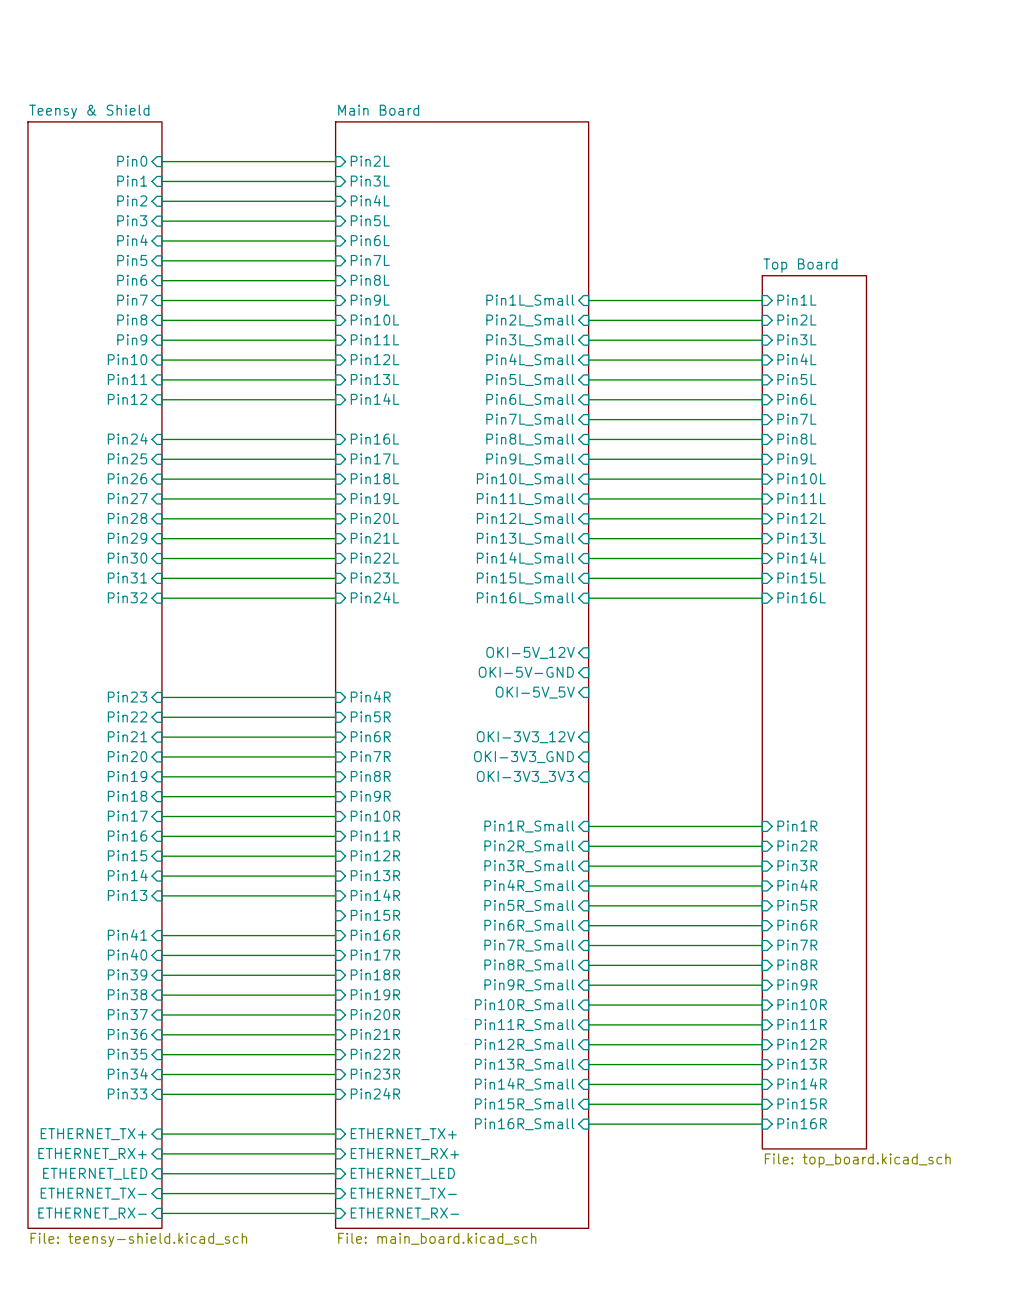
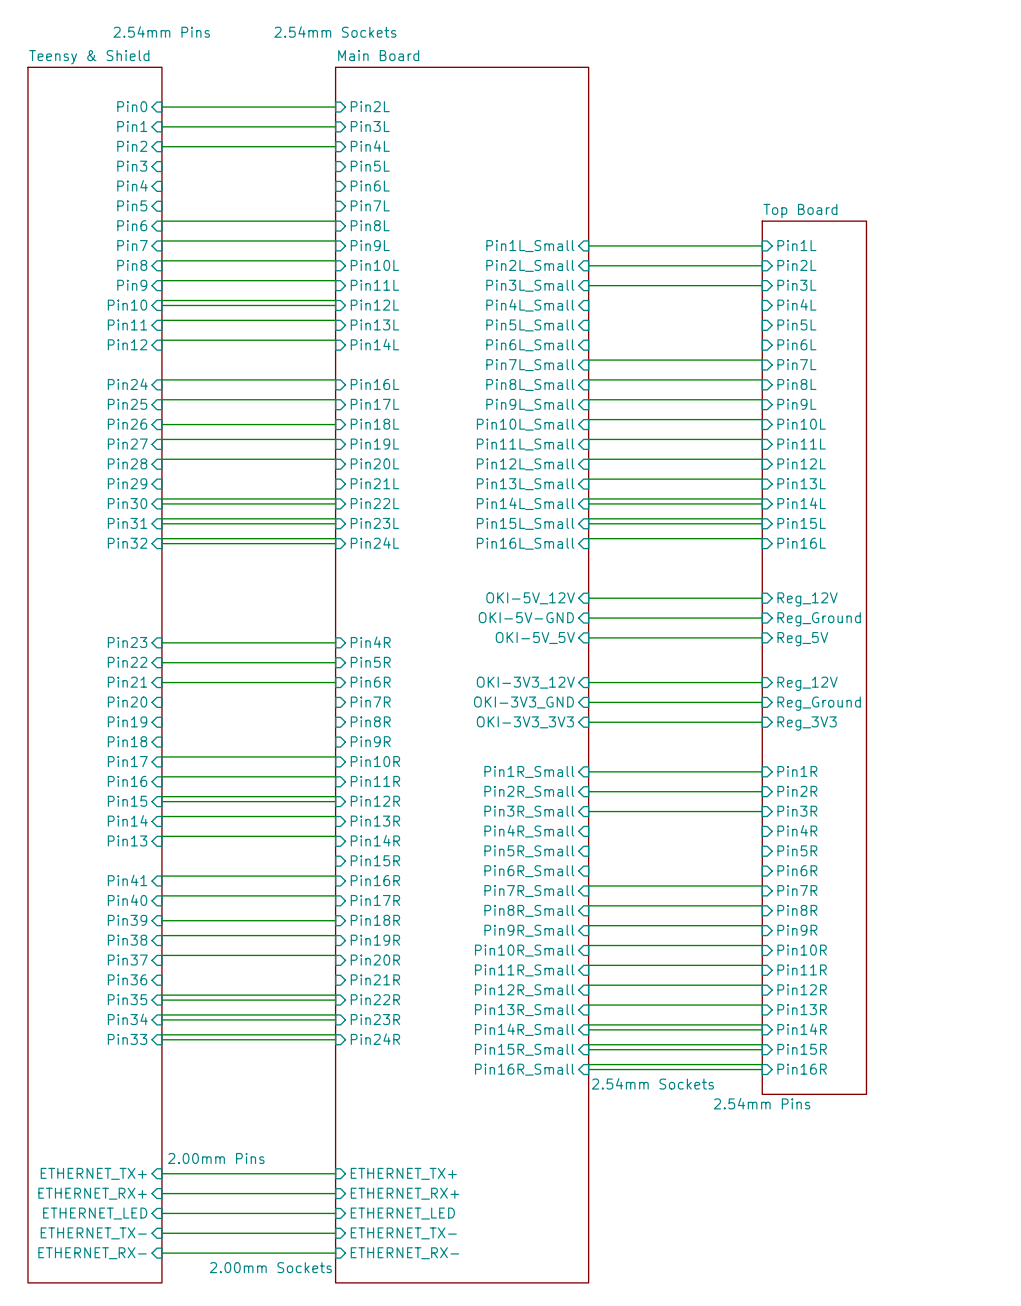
sheet Teensy & Shield text: none -> 2.54mm Pins (161, 31)
sheet Main Board text: none -> 2.54mm Sockets (335, 31)
sheet Main Board name position: Main Board (378, 110) -> Main Board (378, 55)
sheet Teensy & Shield name position: Teensy & Shield (89, 111) -> Teensy & Shield (89, 57)
sheet Teensy & Shield shape: [27, 121, 163, 1229] -> [27, 66, 163, 1284]
sheet Main Board shape: [335, 121, 590, 1229] -> [335, 66, 590, 1284]
sheet pin position: Pin0 (132, 161) -> Pin0 (132, 106)
wire: (161, 161) (335, 161) -> (161, 107) (335, 107)
sheet pin position: Pin2L (370, 161) -> Pin2L (370, 106)
sheet pin position: Pin1 (132, 181) -> Pin1 (132, 126)
wire: (161, 181) (335, 181) -> (161, 126) (335, 126)
sheet pin position: Pin3L (370, 181) -> Pin3L (370, 126)
sheet pin position: Pin2 (132, 200) -> Pin2 (132, 146)
sheet pin position: Pin4L (370, 200) -> Pin4L (370, 146)
wire: (161, 201) (335, 201) -> (161, 146) (335, 146)
sheet pin position: Pin3 (132, 220) -> Pin3 (132, 166)
sheet pin position: Pin5L (370, 220) -> Pin5L (370, 166)
sheet pin position: Pin4 (132, 240) -> Pin4 (132, 185)
sheet pin position: Pin6L (370, 240) -> Pin6L (370, 186)
sheet pin position: Pin5 (132, 260) -> Pin5 (132, 205)
sheet pin position: Pin7L (370, 260) -> Pin7L (370, 205)
sheet pin position: Pin6 (132, 280) -> Pin6 (132, 225)
sheet pin position: Pin8L (370, 280) -> Pin8L (370, 225)
sheet pin position: Pin7 (132, 300) -> Pin7 (132, 245)
sheet pin position: Pin9L (370, 300) -> Pin9L (370, 245)
sheet pin position: Pin1L_Small (530, 300) -> Pin1L_Small (530, 246)
wire: (588, 300) (762, 300) -> (588, 245) (762, 245)
sheet pin position: Pin1L (796, 300) -> Pin1L (796, 245)
sheet pin position: Pin8 (132, 319) -> Pin8 (132, 265)
sheet pin position: Pin10L (374, 319) -> Pin10L (374, 265)
sheet pin position: Pin2L (796, 319) -> Pin2L (796, 265)
sheet pin position: Pin2L_Small (530, 320) -> Pin2L_Small (530, 265)
wire: (588, 320) (762, 320) -> (588, 265) (762, 265)
sheet pin position: Pin9 (132, 339) -> Pin9 (132, 285)
sheet pin position: Pin11L (374, 339) -> Pin11L (374, 285)
sheet pin position: Pin3L (796, 339) -> Pin3L (796, 285)
sheet pin position: Pin3L_Small (530, 340) -> Pin3L_Small (530, 285)
wire: (588, 340) (762, 340) -> (588, 285) (762, 285)
sheet pin position: Pin10 (127, 359) -> Pin10 (127, 305)
sheet pin position: Pin12L (374, 359) -> Pin12L (374, 305)
sheet pin position: Pin4L_Small (530, 359) -> Pin4L_Small (530, 305)
sheet pin position: Pin4L (796, 359) -> Pin4L (796, 304)
wire: (161, 360) (335, 360) -> (161, 305) (335, 305)
sheet pin position: Pin11 (127, 379) -> Pin11 (127, 324)
sheet pin position: Pin13L (374, 379) -> Pin13L (374, 324)
sheet pin position: Pin5L (796, 379) -> Pin5L (796, 324)
sheet pin position: Pin5L_Small (530, 380) -> Pin5L_Small (530, 325)
sheet pin position: Pin12 (127, 399) -> Pin12 (127, 344)
sheet pin position: Pin14L (374, 399) -> Pin14L (374, 344)
sheet pin position: Pin6L_Small (530, 399) -> Pin6L_Small (530, 345)
sheet pin position: Pin6L (796, 399) -> Pin6L (796, 344)
sheet pin position: Pin7L_Small (530, 419) -> Pin7L_Small (530, 365)
sheet pin position: Pin7L (796, 419) -> Pin7L (796, 364)
sheet pin position: Pin24 (127, 438) -> Pin24 (127, 384)
sheet pin position: Pin16L (374, 439) -> Pin16L (374, 384)
sheet pin position: Pin8L_Small (530, 439) -> Pin8L_Small (530, 384)
sheet pin position: Pin8L (796, 439) -> Pin8L (796, 384)
sheet pin position: Pin25 (127, 458) -> Pin25 (127, 404)
sheet pin position: Pin17L (374, 458) -> Pin17L (374, 404)
sheet pin position: Pin9L (796, 458) -> Pin9L (796, 404)
sheet pin position: Pin9L_Small (530, 459) -> Pin9L_Small (530, 404)
sheet pin position: Pin26 (127, 478) -> Pin26 (127, 424)
sheet pin position: Pin18L (374, 478) -> Pin18L (374, 424)
sheet pin position: Pin10L (801, 478) -> Pin10L (801, 424)
wire: (161, 479) (335, 479) -> (161, 424) (335, 424)
sheet pin position: Pin10L_Small (525, 479) -> Pin10L_Small (525, 424)
sheet pin position: Pin27 (127, 498) -> Pin27 (127, 444)
sheet pin position: Pin19L (374, 498) -> Pin19L (374, 444)
sheet pin position: Pin11L (801, 498) -> Pin11L (801, 444)
sheet pin position: Pin11L_Small (525, 499) -> Pin11L_Small (525, 444)
sheet pin position: Pin28 (127, 518) -> Pin28 (127, 463)
sheet pin position: Pin20L (374, 518) -> Pin20L (374, 463)
sheet pin position: Pin12L_Small (525, 518) -> Pin12L_Small (525, 464)
sheet pin position: Pin12L (801, 518) -> Pin12L (801, 463)
sheet pin position: Pin29 (127, 538) -> Pin29 (127, 483)
sheet pin position: Pin21L (374, 538) -> Pin21L (374, 483)
sheet pin position: Pin13L_Small (525, 538) -> Pin13L_Small (525, 484)
sheet pin position: Pin13L (801, 538) -> Pin13L (801, 483)
sheet pin: none -> Pin16L_Small (525, 543)
sheet pin: none -> Pin16L (801, 543)
sheet pin position: Pin14L (801, 557) -> Pin14L (801, 503)
sheet pin position: Pin30 (127, 558) -> Pin30 (127, 503)
wire: (161, 558) (335, 558) -> (161, 503) (335, 503)
sheet pin position: Pin22L (374, 558) -> Pin22L (374, 503)
sheet pin position: Pin14L_Small (525, 558) -> Pin14L_Small (525, 503)
wire: (588, 558) (762, 558) -> (588, 503) (762, 503)
sheet pin position: Pin31 (127, 577) -> Pin31 (127, 523)
sheet pin position: Pin23L (374, 577) -> Pin23L (374, 523)
sheet pin position: Pin15L (801, 577) -> Pin15L (801, 523)
wire: (161, 578) (335, 578) -> (161, 523) (335, 523)
sheet pin position: Pin15L_Small (525, 578) -> Pin15L_Small (525, 523)
wire: (588, 578) (762, 578) -> (588, 523) (762, 523)
sheet pin position: Pin32 (127, 597) -> Pin32 (127, 543)
sheet pin position: Pin24L (374, 597) -> Pin24L (374, 543)
sheet pin: Pin16L (801, 597) -> Reg_12V (807, 599)
wire: (161, 598) (335, 598) -> (161, 543) (335, 543)
sheet pin: Pin16L_Small (525, 598) -> OKI-5V_12V (530, 598)
wire: none -> (588, 618) (762, 618)
sheet pin: none -> Reg_Ground (819, 619)
wire: none -> (588, 637) (762, 637)
sheet pin: none -> Reg_5V (802, 639)
sheet pin: OKI-5V_12V (530, 652) -> none
sheet Top Board: none -> (814, 657)
sheet pin position: OKI-5V-GND (526, 672) -> OKI-5V-GND (526, 617)
wire: none -> (588, 682) (762, 682)
sheet pin: none -> Reg_12V (807, 683)
sheet pin position: OKI-5V_5V (535, 692) -> OKI-5V_5V (535, 638)
sheet pin position: Pin4R (370, 696) -> Pin4R (370, 642)
sheet pin position: Pin23 (127, 697) -> Pin23 (127, 642)
wire: (161, 697) (335, 697) -> (161, 642) (335, 642)
wire: none -> (588, 702) (762, 702)
sheet pin: none -> Reg_Ground (819, 703)
sheet Top Board: File: top_board.kicad_sch (814, 712) -> none
sheet pin position: Pin22 (127, 716) -> Pin22 (127, 662)
sheet pin position: Pin5R (370, 716) -> Pin5R (370, 662)
wire: (161, 717) (335, 717) -> (161, 662) (335, 662)
wire: none -> (588, 722) (762, 722)
sheet pin: none -> Reg_3V3 (807, 723)
sheet pin position: Pin21 (127, 736) -> Pin21 (127, 682)
sheet pin position: Pin6R (370, 736) -> Pin6R (370, 682)
wire: (161, 737) (335, 737) -> (161, 682) (335, 682)
sheet pin position: OKI-3V3_12V (525, 737) -> OKI-3V3_12V (525, 682)
sheet pin position: Pin20 (127, 756) -> Pin20 (127, 702)
sheet pin position: Pin7R (370, 756) -> Pin7R (370, 702)
sheet pin position: OKI-3V3_GND (523, 757) -> OKI-3V3_GND (523, 702)
sheet pin position: Pin19 (127, 776) -> Pin19 (127, 721)
sheet pin position: Pin8R (370, 776) -> Pin8R (370, 721)
sheet pin position: OKI-3V3_3V3 (525, 776) -> OKI-3V3_3V3 (525, 722)
sheet pin position: Pin18 (127, 796) -> Pin18 (127, 741)
sheet pin position: Pin9R (370, 796) -> Pin9R (370, 741)
sheet pin position: Pin17 (127, 816) -> Pin17 (127, 761)
sheet pin position: Pin10R (375, 816) -> Pin10R (375, 761)
sheet pin position: Pin1R_Small (529, 826) -> Pin1R_Small (529, 771)
wire: (588, 826) (762, 826) -> (588, 771) (762, 771)
sheet pin position: Pin1R (797, 826) -> Pin1R (797, 771)
sheet pin position: Pin16 (127, 835) -> Pin16 (127, 781)
sheet pin position: Pin11R (375, 835) -> Pin11R (375, 781)
sheet pin position: Pin2R (797, 845) -> Pin2R (797, 791)
sheet pin position: Pin2R_Small (529, 846) -> Pin2R_Small (529, 791)
wire: (588, 846) (762, 846) -> (588, 791) (762, 791)
sheet pin position: Pin15 (127, 855) -> Pin15 (127, 801)
sheet pin position: Pin12R (375, 855) -> Pin12R (375, 801)
wire: (161, 856) (335, 856) -> (161, 801) (335, 801)
sheet pin position: Pin3R (797, 865) -> Pin3R (797, 811)
sheet pin position: Pin3R_Small (529, 866) -> Pin3R_Small (529, 811)
wire: (588, 866) (762, 866) -> (588, 811) (762, 811)
sheet pin position: Pin14 (127, 875) -> Pin14 (127, 820)
sheet pin position: Pin13R (375, 875) -> Pin13R (375, 821)
sheet pin position: Pin4R_Small (529, 885) -> Pin4R_Small (529, 831)
sheet pin position: Pin4R (797, 885) -> Pin4R (797, 830)
sheet pin position: Pin13 (127, 895) -> Pin13 (127, 840)
sheet pin position: Pin14R (375, 895) -> Pin14R (375, 840)
sheet pin position: Pin5R_Small (529, 905) -> Pin5R_Small (529, 851)
sheet pin position: Pin5R (797, 905) -> Pin5R (797, 850)
sheet pin position: Pin15R (375, 915) -> Pin15R (375, 860)
sheet pin position: Pin6R_Small (529, 925) -> Pin6R_Small (529, 871)
sheet pin position: Pin6R (797, 925) -> Pin6R (797, 870)
sheet pin position: Pin41 (127, 934) -> Pin41 (127, 880)
sheet pin position: Pin16R (375, 935) -> Pin16R (375, 880)
sheet pin position: Pin7R_Small (529, 945) -> Pin7R_Small (529, 891)
sheet pin position: Pin7R (797, 945) -> Pin7R (797, 890)
sheet pin position: Pin40 (127, 954) -> Pin40 (127, 900)
sheet pin position: Pin17R (375, 955) -> Pin17R (375, 900)
sheet pin position: Pin8R (797, 964) -> Pin8R (797, 910)
sheet pin position: Pin8R_Small (529, 965) -> Pin8R_Small (529, 910)
sheet pin position: Pin39 (127, 974) -> Pin39 (127, 920)
sheet pin position: Pin18R (375, 974) -> Pin18R (375, 920)
wire: (161, 975) (335, 975) -> (161, 920) (335, 920)
sheet pin position: Pin9R (797, 984) -> Pin9R (797, 930)
sheet pin position: Pin9R_Small (529, 985) -> Pin9R_Small (529, 930)
sheet pin position: Pin38 (127, 994) -> Pin38 (127, 940)
sheet pin position: Pin19R (375, 994) -> Pin19R (375, 940)
sheet pin position: Pin10R (802, 1004) -> Pin10R (802, 950)
sheet pin position: Pin10R_Small (524, 1005) -> Pin10R_Small (524, 950)
sheet pin position: Pin37 (127, 1014) -> Pin37 (127, 960)
sheet pin position: Pin20R (375, 1014) -> Pin20R (375, 960)
sheet pin position: Pin11R_Small (524, 1024) -> Pin11R_Small (524, 970)
sheet pin position: Pin11R (802, 1024) -> Pin11R (802, 969)
sheet pin position: Pin36 (127, 1034) -> Pin36 (127, 979)
sheet pin position: Pin21R (375, 1034) -> Pin21R (375, 979)
sheet pin position: Pin12R_Small (524, 1044) -> Pin12R_Small (524, 990)
sheet pin position: Pin12R (802, 1044) -> Pin12R (802, 989)
sheet pin position: Pin35 (127, 1054) -> Pin35 (127, 999)
wire: (161, 1054) (335, 1054) -> (161, 1000) (335, 1000)
sheet pin position: Pin22R (375, 1054) -> Pin22R (375, 999)
sheet pin position: Pin13R_Small (524, 1064) -> Pin13R_Small (524, 1010)
sheet pin position: Pin13R (802, 1064) -> Pin13R (802, 1009)
sheet pin position: Pin34 (127, 1073) -> Pin34 (127, 1019)
wire: (161, 1074) (335, 1074) -> (161, 1019) (335, 1019)
sheet pin position: Pin23R (375, 1074) -> Pin23R (375, 1019)
sheet Main Board text: none -> 2.54mm Sockets (652, 1083)
sheet pin position: Pin14R (802, 1083) -> Pin14R (802, 1029)
sheet pin position: Pin14R_Small (524, 1084) -> Pin14R_Small (524, 1029)
wire: (588, 1084) (762, 1084) -> (588, 1029) (762, 1029)
sheet pin position: Pin33 (127, 1093) -> Pin33 (127, 1039)
sheet pin position: Pin24R (375, 1093) -> Pin24R (375, 1039)
wire: (161, 1094) (335, 1094) -> (161, 1039) (335, 1039)
sheet pin position: Pin15R (802, 1103) -> Pin15R (802, 1049)
sheet pin position: Pin15R_Small (524, 1104) -> Pin15R_Small (524, 1049)
wire: (588, 1104) (762, 1104) -> (588, 1049) (762, 1049)
sheet pin position: Pin16R (802, 1123) -> Pin16R (802, 1069)
sheet pin position: Pin16R_Small (524, 1124) -> Pin16R_Small (524, 1069)
wire: (588, 1124) (762, 1124) -> (588, 1069) (762, 1069)
sheet pin: ETHERNET_TX+ (93, 1134) -> none
wire: (161, 1134) (335, 1134) -> (161, 1253) (335, 1253)
sheet pin: ETHERNET_TX+ (403, 1134) -> none
sheet pin: ETHERNET_RX+ (92, 1153) -> none
wire: (161, 1153) (335, 1153) -> (161, 1233) (335, 1233)
sheet pin: ETHERNET_RX+ (404, 1153) -> none
sheet Teensy & Shield text: none -> 2.00mm Pins (216, 1158)
sheet pin: ETHERNET_LED (95, 1173) -> ETHERNET_TX+ (93, 1173)
sheet pin: ETHERNET_LED (402, 1173) -> ETHERNET_TX+ (403, 1173)
sheet pin: ETHERNET_TX- (93, 1193) -> ETHERNET_RX+ (92, 1193)
sheet pin: ETHERNET_TX- (403, 1193) -> ETHERNET_RX+ (404, 1193)
sheet pin: ETHERNET_RX- (92, 1213) -> ETHERNET_LED (95, 1213)
sheet pin: ETHERNET_RX- (404, 1213) -> ETHERNET_LED (402, 1213)
sheet pin: none -> ETHERNET_TX- (93, 1233)
sheet pin: none -> ETHERNET_TX- (403, 1233)
sheet Main Board value: File: main_board.kicad_sch (437, 1238) -> none
sheet Teensy & Shield value: File: teensy-shield.kicad_sch (138, 1239) -> none
sheet pin: none -> ETHERNET_RX- (92, 1253)
sheet pin: none -> ETHERNET_RX- (404, 1253)
sheet Main Board text: none -> 2.00mm Sockets (270, 1267)

